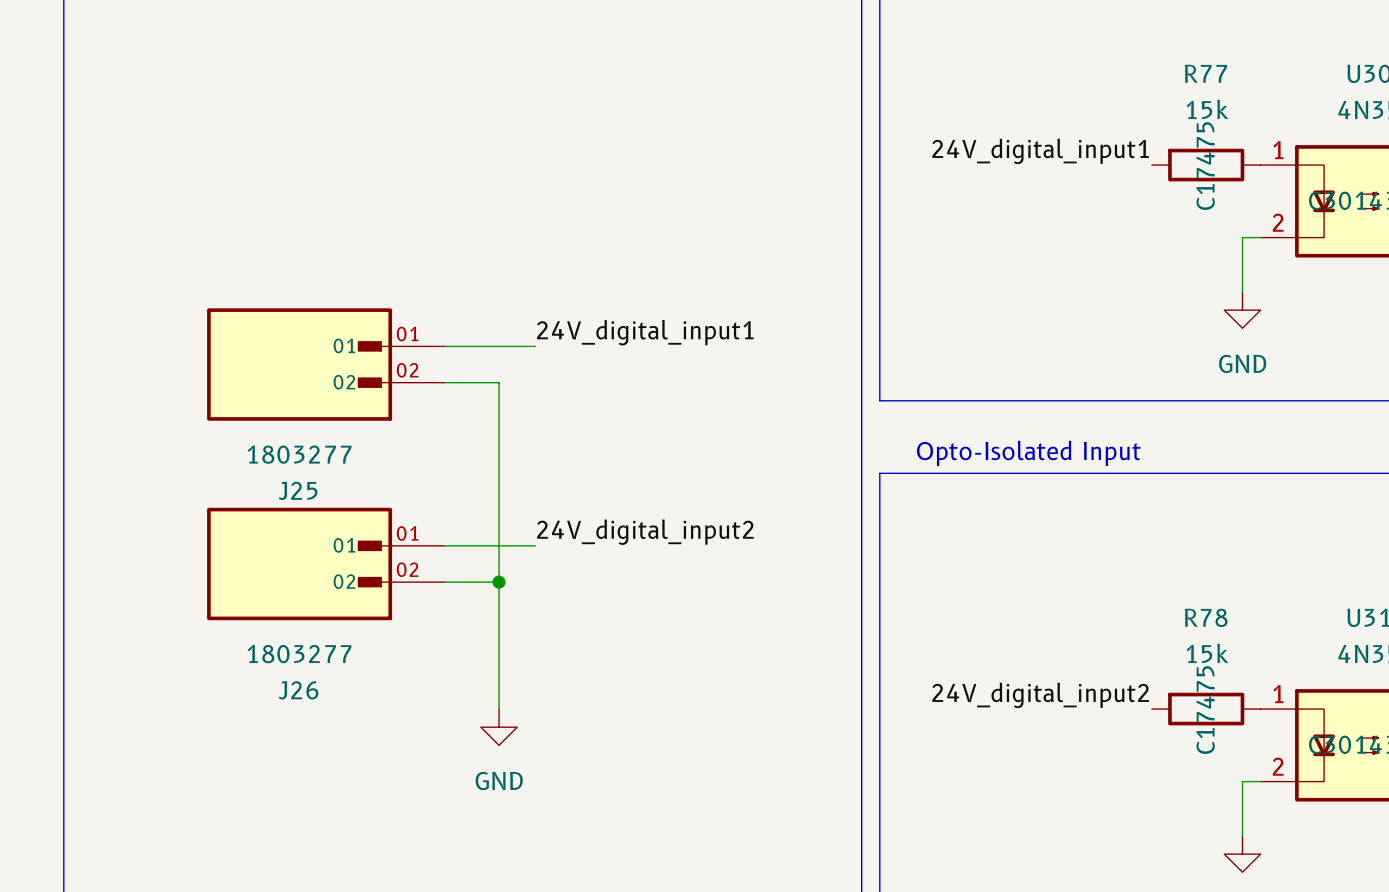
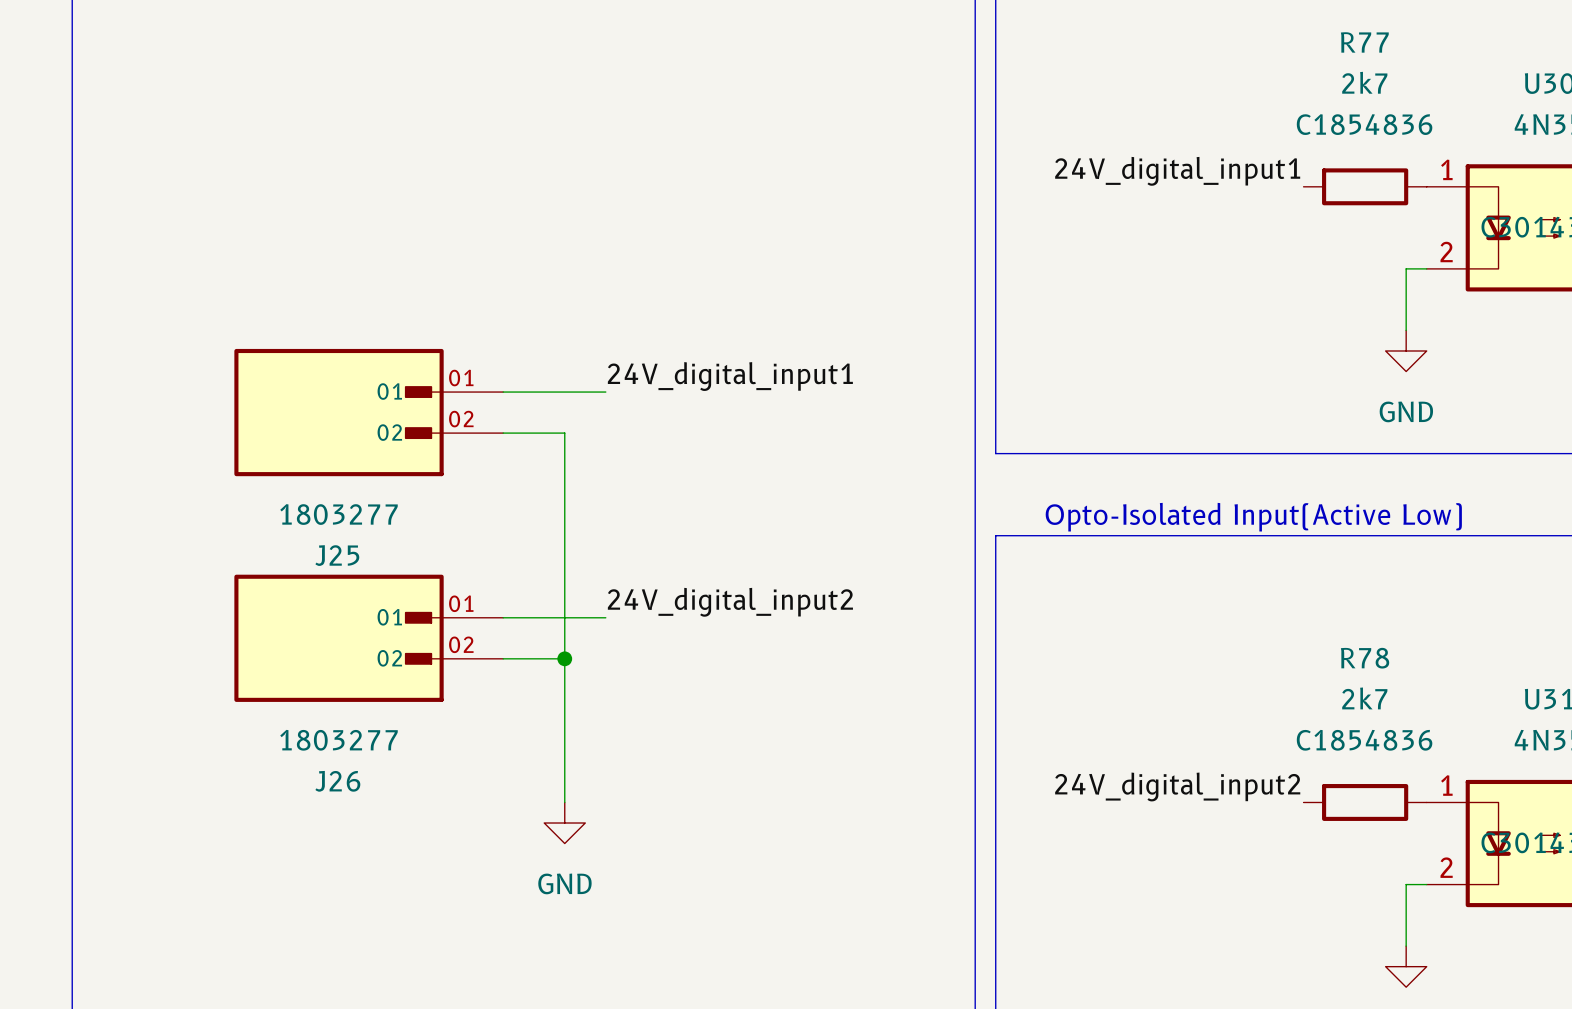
R77 name position: R77 (1205, 73) -> R77 (1364, 42)
R77 value: 15k (1207, 109) -> 2k7 (1364, 82)
R77 text: C17475 (1205, 166) -> C1854836 (1364, 124)
text: Opto-Isolated Input (1028, 453) -> Opto-Isolated Input(Active Low) (1253, 517)
R78 name position: R78 (1206, 617) -> R78 (1365, 658)
R78 value: 15k (1207, 653) -> 2k7 (1364, 698)
R78 text: C17475 (1205, 710) -> C1854836 (1364, 740)

